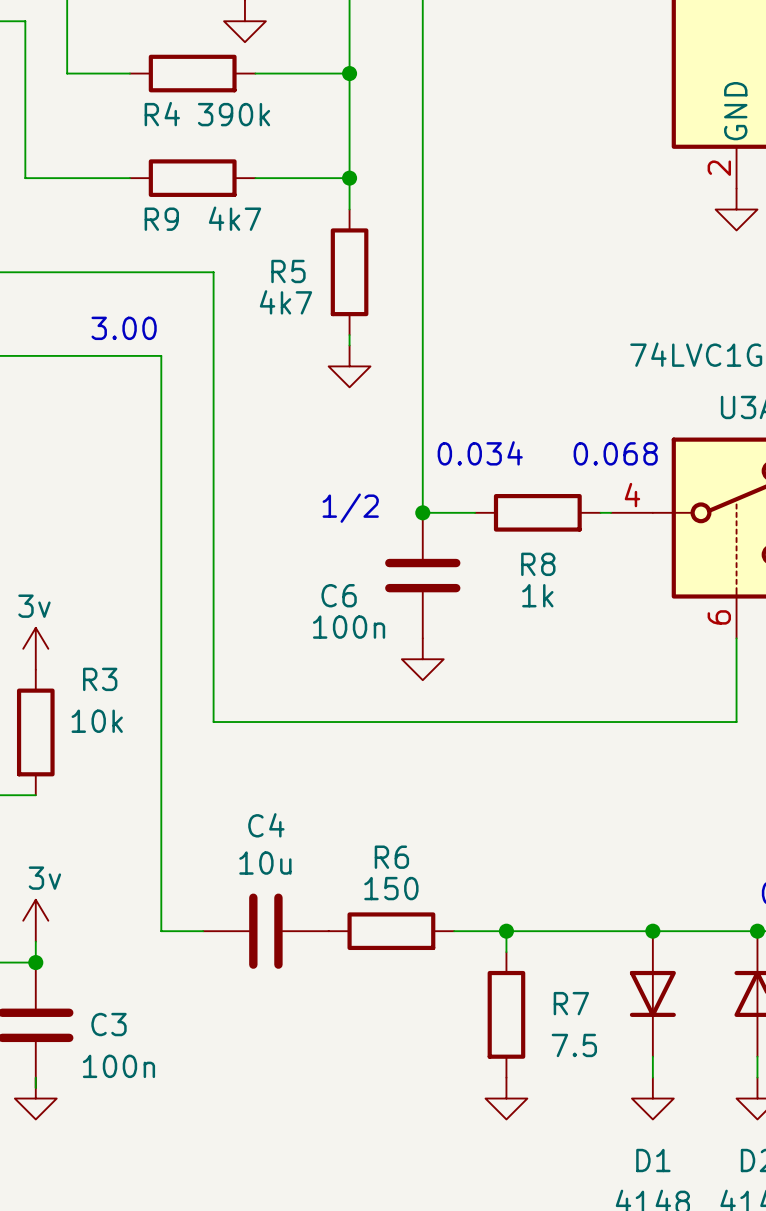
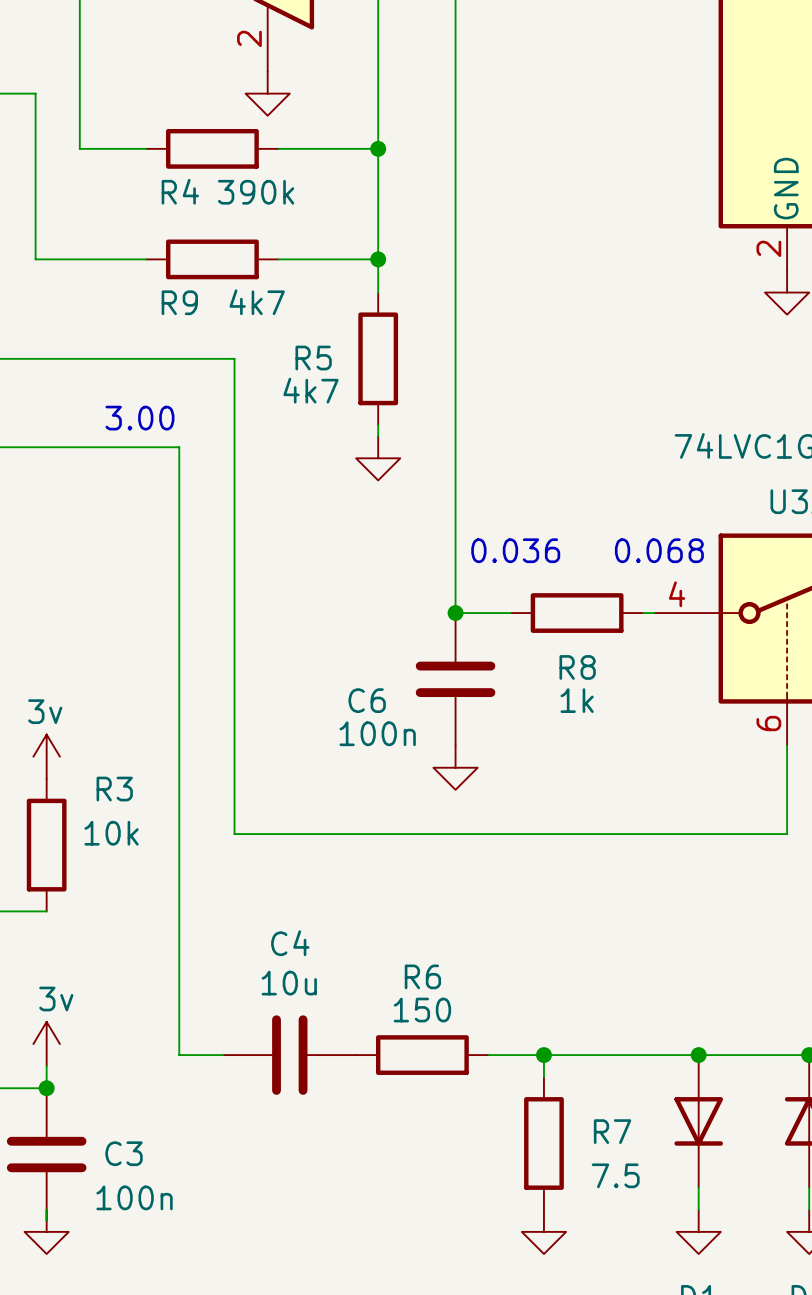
text: 0.034 (480, 453) -> 0.036 (515, 550)
text: 1/2 (350, 508) -> none

